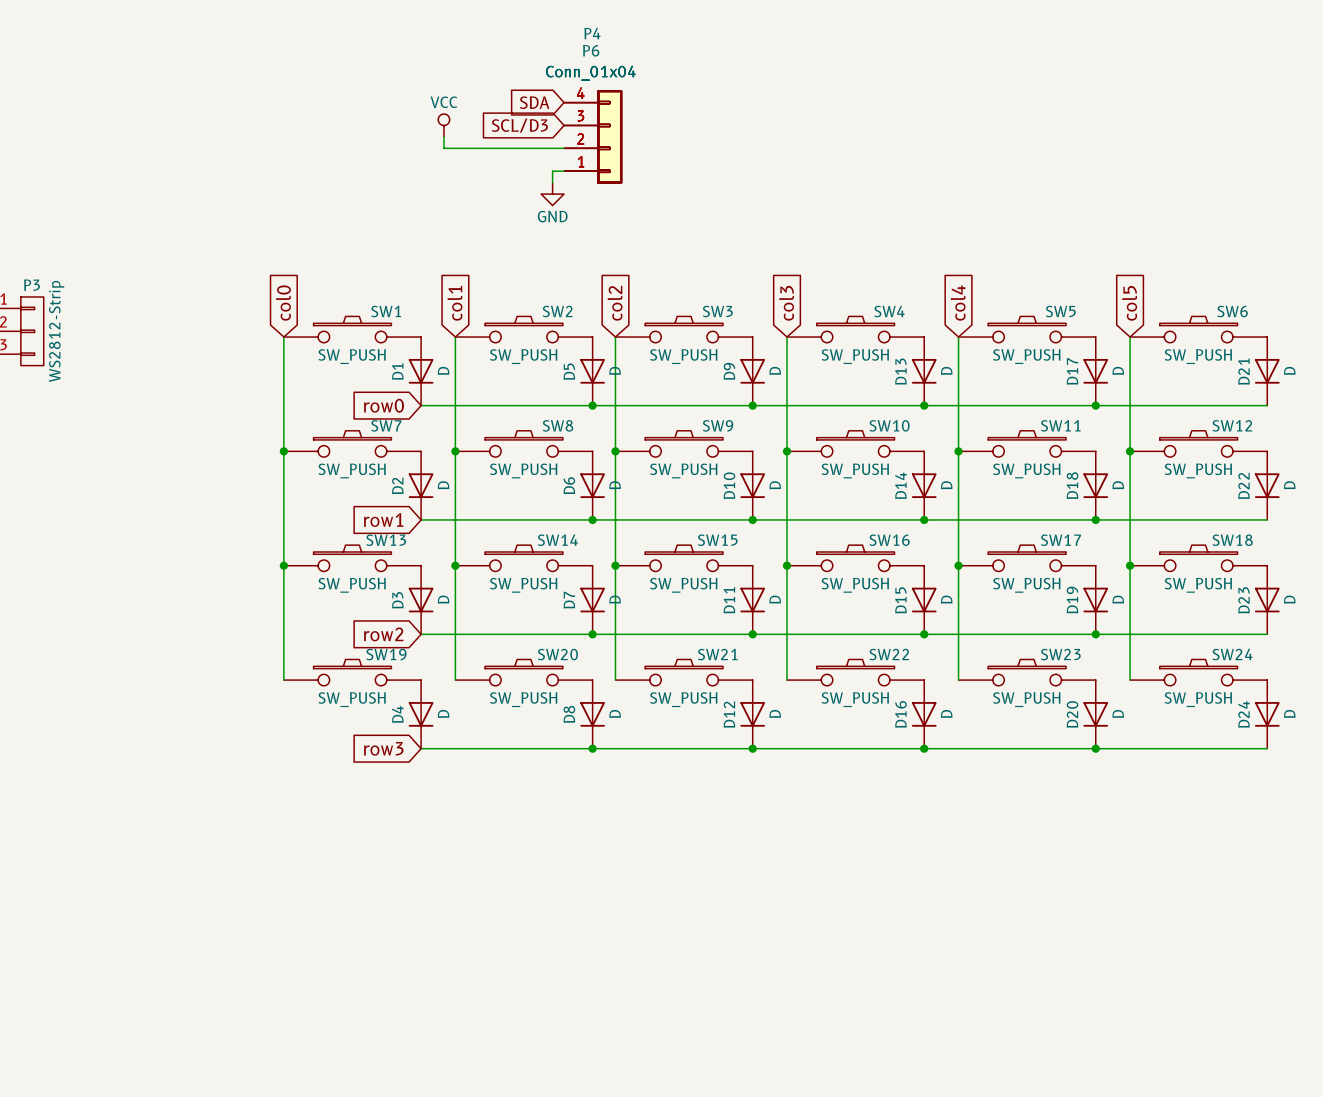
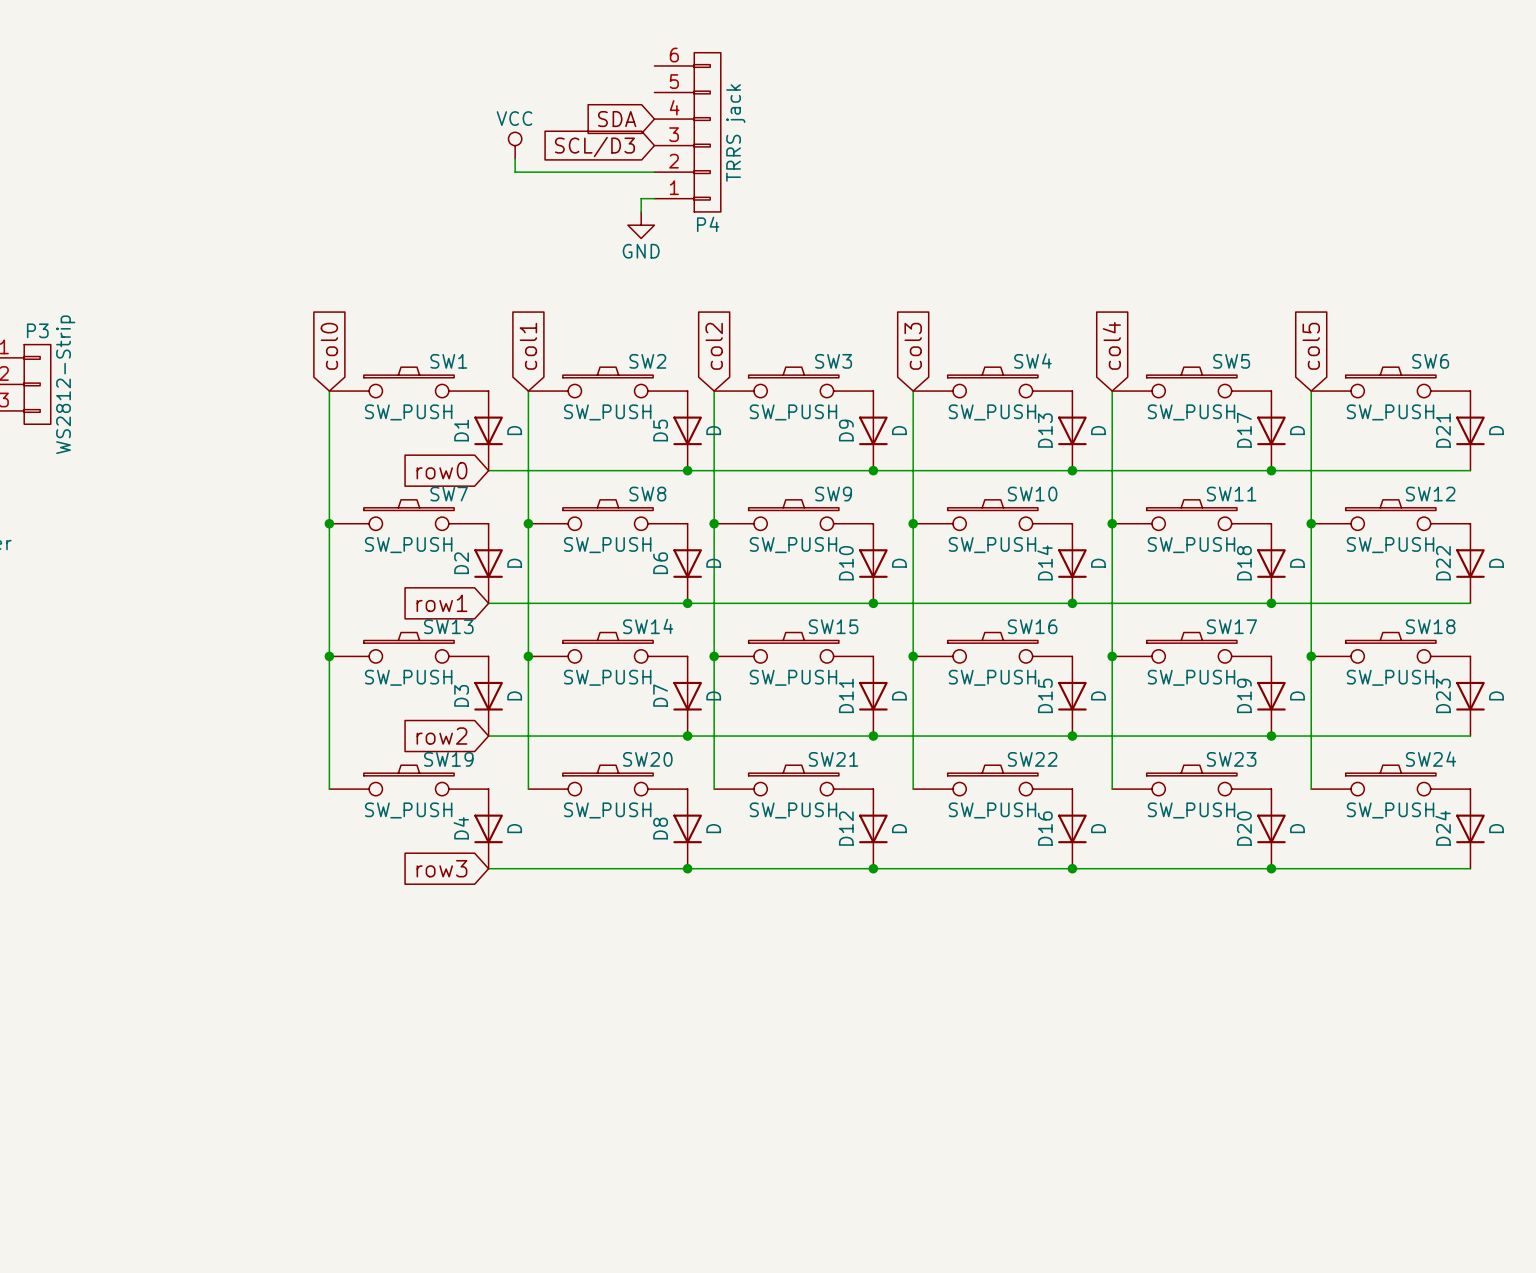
P4 name position: P4 (592, 33) -> P4 (708, 224)
P4 value: Conn_01x04 (590, 73) -> TRRS jack (735, 132)
P4 symbol: [564, 90, 623, 184] -> [654, 52, 721, 212]
P6: Conn_01x04 (593, 136) -> none

